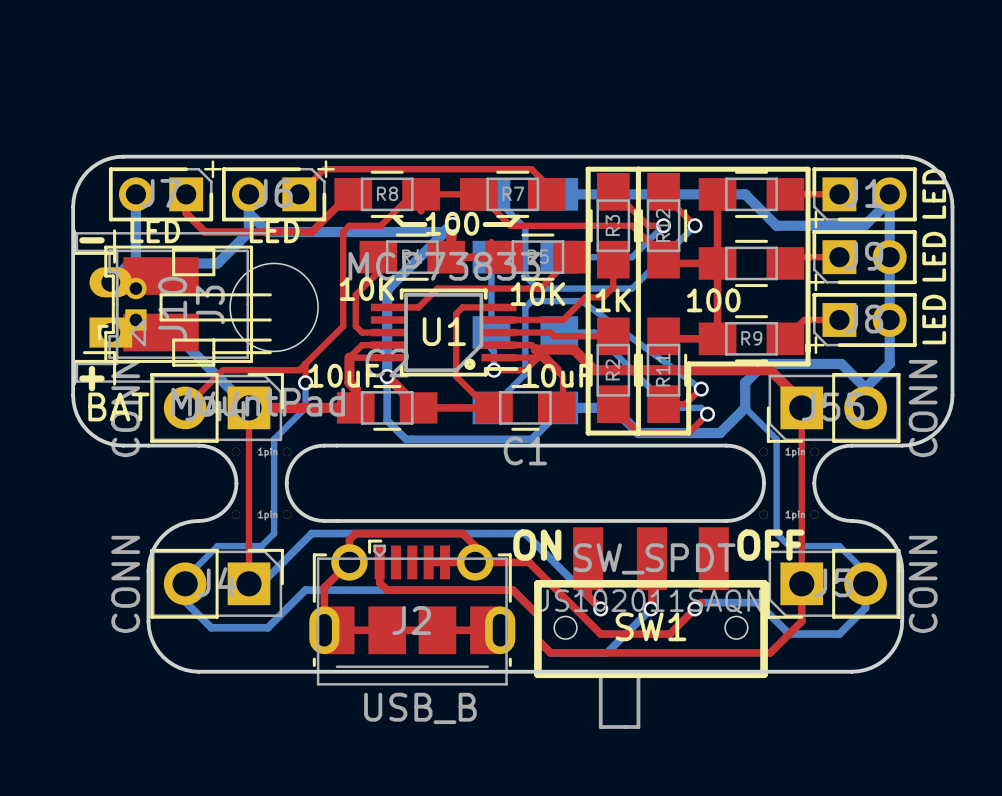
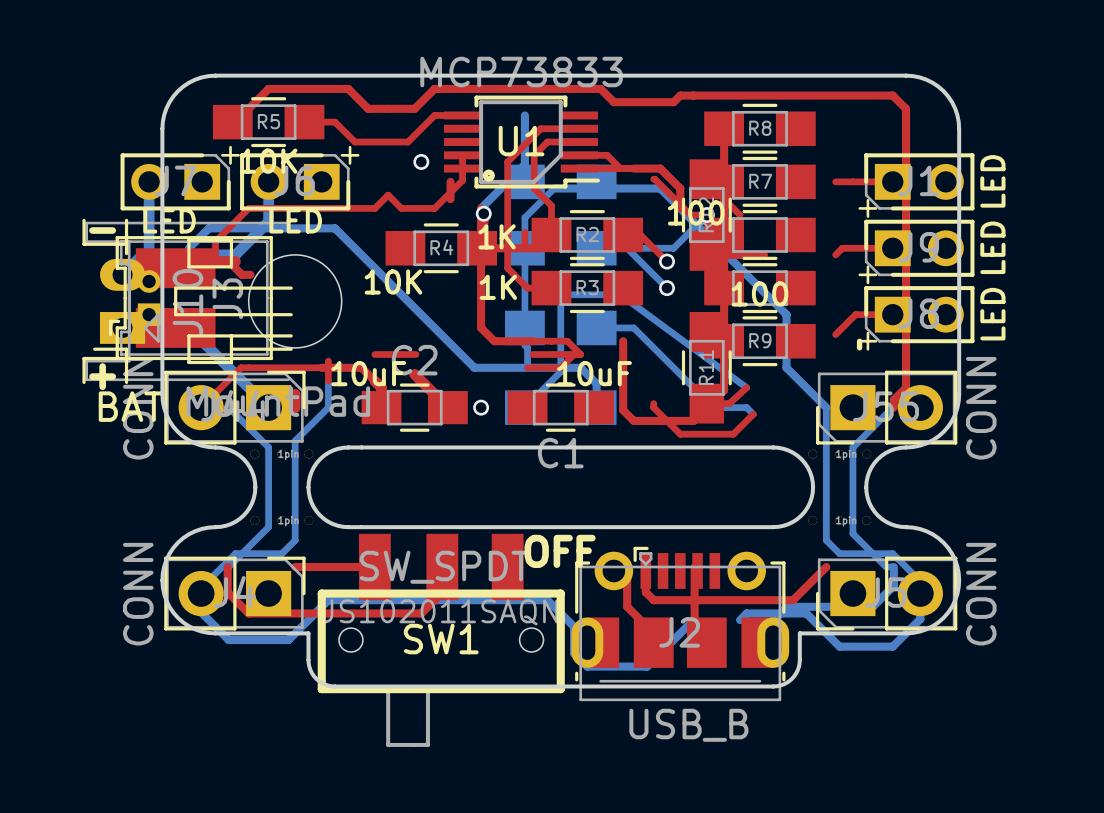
top track: none -> (311, 115) (304, 122) (335, 122) (354, 142) (408, 142) (434, 115) (462, 115)
bottom track: none -> (524, 115) (524, 164) (481, 208)
top track: none -> (232, 122) (235, 122) (268, 88) (348, 88) (368, 108) (414, 108) (434, 88) (600, 88) (613, 102) (673, 102) (680, 95) (892, 95) (906, 108) (906, 387) (893, 399) (893, 407)
top track: none -> (579, 128) (540, 128) (507, 161) (507, 268) (527, 288) (551, 288)
top track: none -> (724, 128) (724, 390) (693, 420) (633, 420) (623, 410) (623, 341)
top track: none -> (579, 142) (547, 142) (534, 155) (534, 188) (551, 205) (551, 234)
top track: none -> (462, 155) (462, 180) (434, 208) (401, 208) (388, 195) (374, 208) (248, 208) (215, 241) (215, 261) (235, 261)
top track: none -> (579, 155) (607, 155) (620, 168)
line: (638, 169) (638, 433) -> none
via: none -> (421, 161)
top track: none -> (579, 168) (660, 168) (680, 188) (680, 208)
top track: (186, 194) (186, 213) (205, 232) (311, 232) (349, 194) (353, 194) (353, 203) -> none
top track: (299, 194) (324, 169) (531, 169) (546, 184) (546, 194) -> none
R8 position: (387, 194) -> (759, 128)
bottom track: (491, 194) (525, 228) (525, 276) (537, 288) (632, 288) (694, 225) -> none
R7 position: (512, 194) -> (759, 181)
bottom track: (559, 194) (745, 194) (776, 225) (864, 225) (889, 200) -> none
top track: (717, 194) (717, 338) (666, 338) (663, 336) -> none
part: (751, 194) -> none
bottom track: (889, 194) (889, 363) (865, 388) -> none
bottom track: (249, 213) (267, 232) (443, 232) (452, 224) (387, 289) (387, 420) (406, 439) (531, 439) (559, 411) (559, 407) (613, 407) (638, 433) (720, 433) (745, 407) -> none
line: (394, 216) (402, 224) (424, 224) -> none
line: (517, 216) (510, 224) (485, 224) -> none
top track: none -> (481, 208) (481, 327) (494, 341) (532, 341)
R3 rotation: 0° (613, 225) -> 90° clockwise (587, 288)
R3 position: (613, 225) -> (587, 288)
via: (694, 225) -> none
bottom track: none -> (596, 234) (613, 234) (667, 288)
top track: none -> (623, 234) (640, 234) (667, 261)
top track: (663, 244) (663, 259) (663, 257) (632, 225) (510, 225) (478, 194) (412, 194) (380, 225) (349, 225) (343, 232) (343, 326) (299, 370) -> none
part: none -> (759, 234)
R2 value: none -> 1K (497, 236)
bottom track: none -> (188, 248) (208, 228) (335, 228) (474, 367) (580, 367) (596, 383) (596, 407)
top track: (378, 257) (378, 272) (355, 294) (355, 326) (362, 332) (388, 332) -> none
R5 position: (537, 257) -> (268, 122)
top track: (571, 257) (540, 288) (437, 288) (418, 307) (388, 307) -> none
top track: (613, 259) (613, 287) (603, 297) (585, 297) (563, 319) (498, 319) -> none
part: (751, 263) -> none
top track: none -> (228, 261) (242, 274) (250, 274)
via: none -> (667, 261)
via: none -> (667, 288)
part: none -> (759, 288)
top track: (498, 307) (462, 307) (456, 313) (456, 376) (487, 407) (424, 407) -> none
U1 position: (444, 332) -> (521, 142)
top track: (498, 332) (550, 332) (554, 336) (613, 336) -> none
R9 position: (751, 338) -> (759, 341)
top track: (388, 345) (362, 345) (349, 357) (349, 382) -> (321, 367) (361, 367) (374, 381)
line: (808, 345) (808, 169) (588, 169) (588, 433) (688, 433) (688, 363) (808, 363) (808, 351) -> none
top track: (537, 351) (536, 349) (573, 349) (594, 370) (770, 370) (801, 401) (801, 583) -> none
top track: (544, 357) (563, 376) (563, 407) -> none
drawing position: (469, 364) -> (488, 175)
via: (493, 370) -> none
R2 rotation: 0° (613, 370) -> 90° clockwise (587, 234)
R2 position: (613, 370) -> (587, 234)
via: (387, 376) -> none
via: (305, 382) -> none
bottom track: (865, 388) (841, 363) (764, 363) (745, 382) (745, 407) -> none
via: (701, 389) -> none
top track: none -> (295, 394) (295, 407)
bottom track: none -> (227, 407) (268, 447) (268, 527) (227, 566)
top track: (349, 407) (249, 407) (249, 583) -> none
via: none -> (481, 407)
bottom track: (745, 407) (776, 439) -> (524, 248) (524, 217) (554, 188) (660, 188) (786, 314) (786, 367) (826, 407) (826, 440)
bottom track: none -> (893, 407) (852, 447) (852, 533) (886, 566) (893, 566) (893, 585) (872, 606) (786, 606) (773, 620)
via: (707, 414) -> none
board edge: (198, 445) (110, 443) (98, 438) (87, 430) (79, 420) (74, 408) (73, 395) (73, 200) (79, 181) (87, 171) (98, 163) (110, 158) (123, 156) (902, 156) (921, 160) (932, 167) (942, 176) (948, 187) (952, 200) (952, 395) (950, 408) (945, 420) (937, 430) (921, 441) (902, 445) (852, 445) -> (215, 447) (195, 443) (177, 431) (166, 414) (162, 394) (162, 121) (169, 102) (177, 91) (195, 79) (215, 75) (906, 75) (919, 77) (932, 82) (948, 96) (955, 108) (958, 121) (958, 401) (955, 414) (943, 431) (926, 443) (906, 447)
text: ON (537, 545) -> none
text position: OFF (770, 545) -> OFF (560, 551)
top track: none -> (227, 566) (227, 592) (248, 613) (421, 613) (442, 592) (442, 566)
top track: none -> (295, 566) (374, 566)
top track: none -> (826, 566) (793, 600) (653, 600) (645, 592) (645, 570)
top track: (379, 562) (379, 582) (387, 590) (512, 590) (537, 615) (537, 640) (550, 652) (770, 652) (801, 621) (801, 583) -> none
top track: (428, 562) (529, 562) (600, 634) (669, 634) (701, 602) -> none
top track: (475, 562) (475, 546) (462, 533) (355, 533) (349, 539) (349, 562) (324, 587) (324, 630) (500, 630) -> none
board edge: (148, 571) (150, 634) (158, 652) (173, 664) (185, 670) (198, 671) (311, 671) -> (162, 580) (164, 594) (169, 606) (177, 617) (195, 629) (215, 633) (308, 633) (308, 663) (312, 673) (321, 682) (335, 686)
board edge: (902, 571) (900, 634) (891, 652) (877, 664) (865, 670) (852, 671) (726, 671) -> (959, 580) (955, 600) (948, 612) (938, 622) (919, 631) (906, 633) (799, 633) (799, 663) (796, 673) (786, 682) (773, 686)
bottom track: (249, 583) (261, 583) (311, 533) (525, 533) (600, 608) -> none
via: (600, 608) -> none
via: (651, 608) -> none
via: (694, 608) -> none
J2 position: (412, 612) -> (680, 623)
SW1 position: (651, 628) -> (441, 640)

